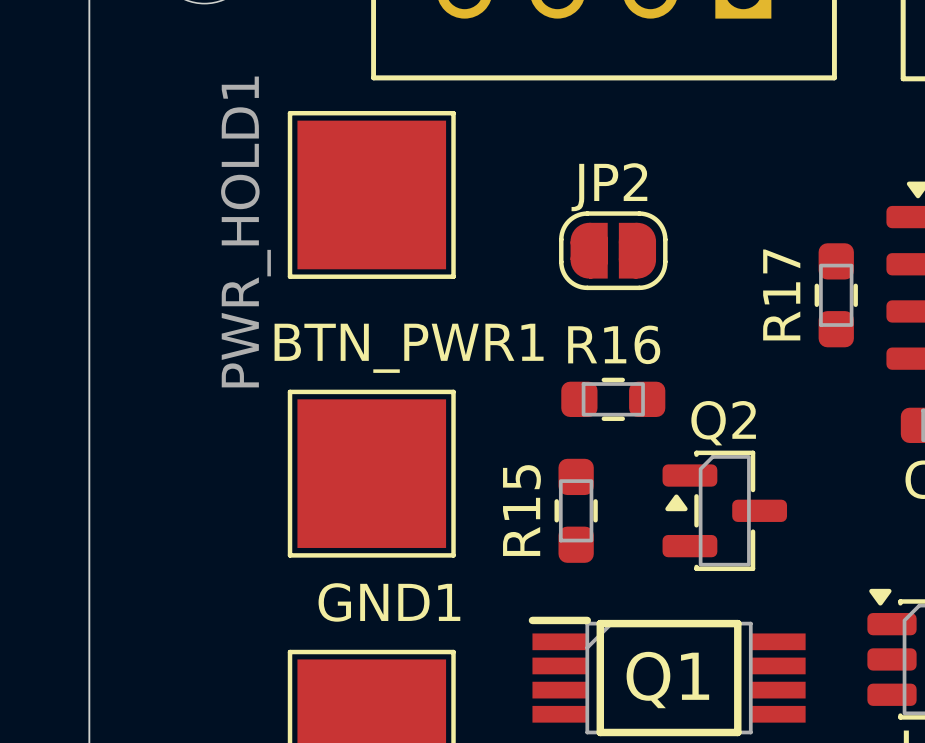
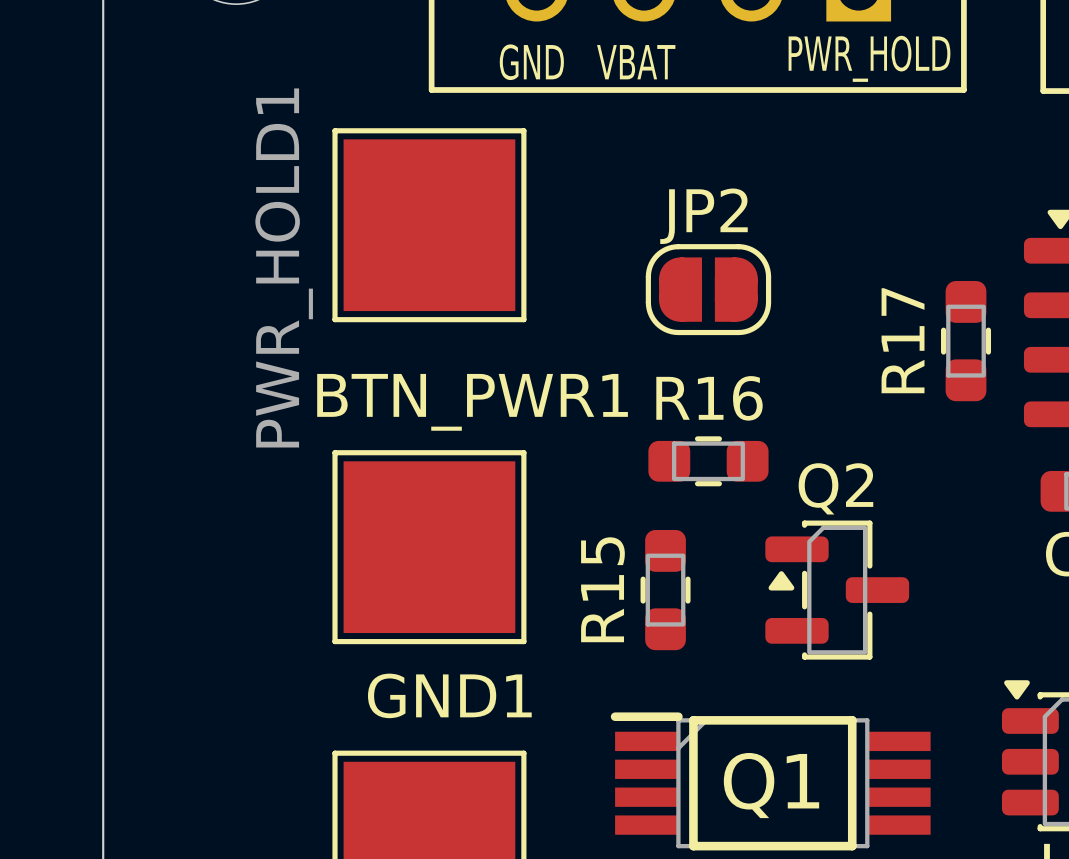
text: none -> PWR_HOLD (869, 58)
text: none -> GND (531, 62)
text: none -> VBAT (636, 62)

